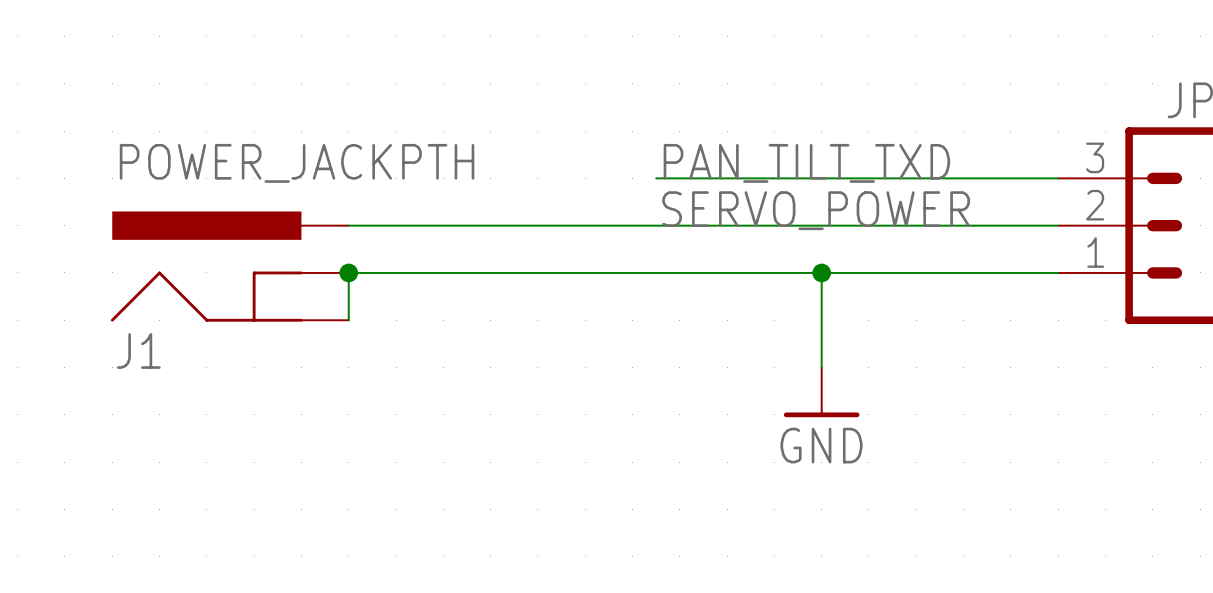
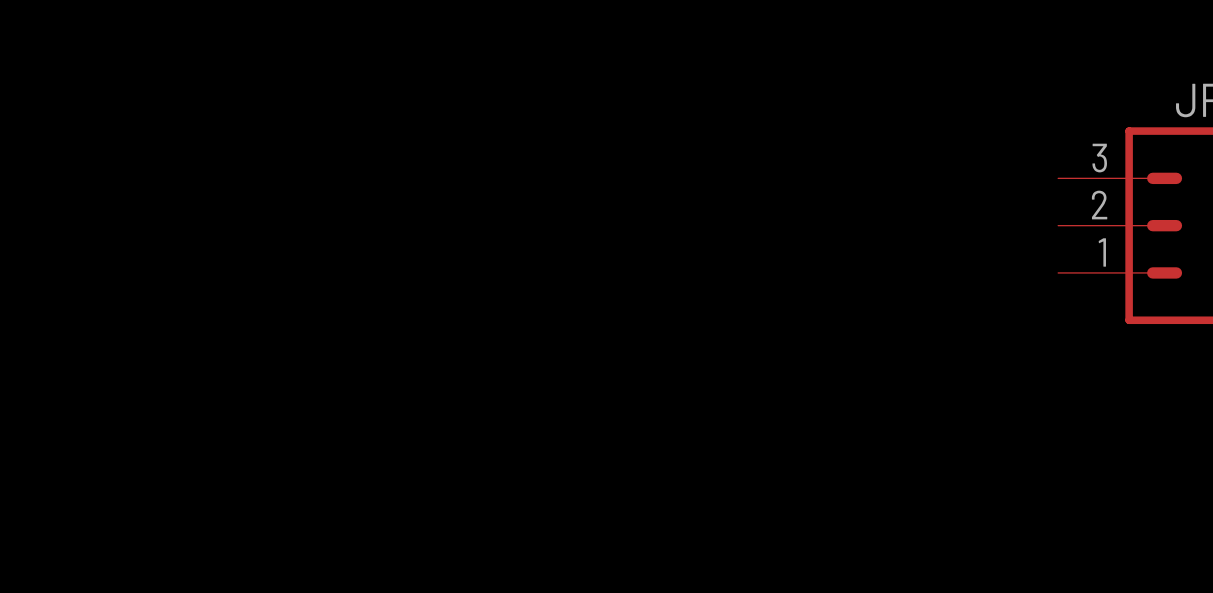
label: PAN_TILT_TXD (806, 163) -> none
wire: (656, 178) (1058, 178) -> none
label: SERVO_POWER (816, 210) -> none
wire: (348, 225) (1058, 225) -> none
J1: POWER_JACKPTH (229, 266) -> none
junction: (348, 272) -> none
wire: (821, 272) (821, 367) -> none
junction: (821, 272) -> none
wire: (1058, 272) (348, 272) (348, 320) -> none
power symbol: GND (821, 392) -> none

